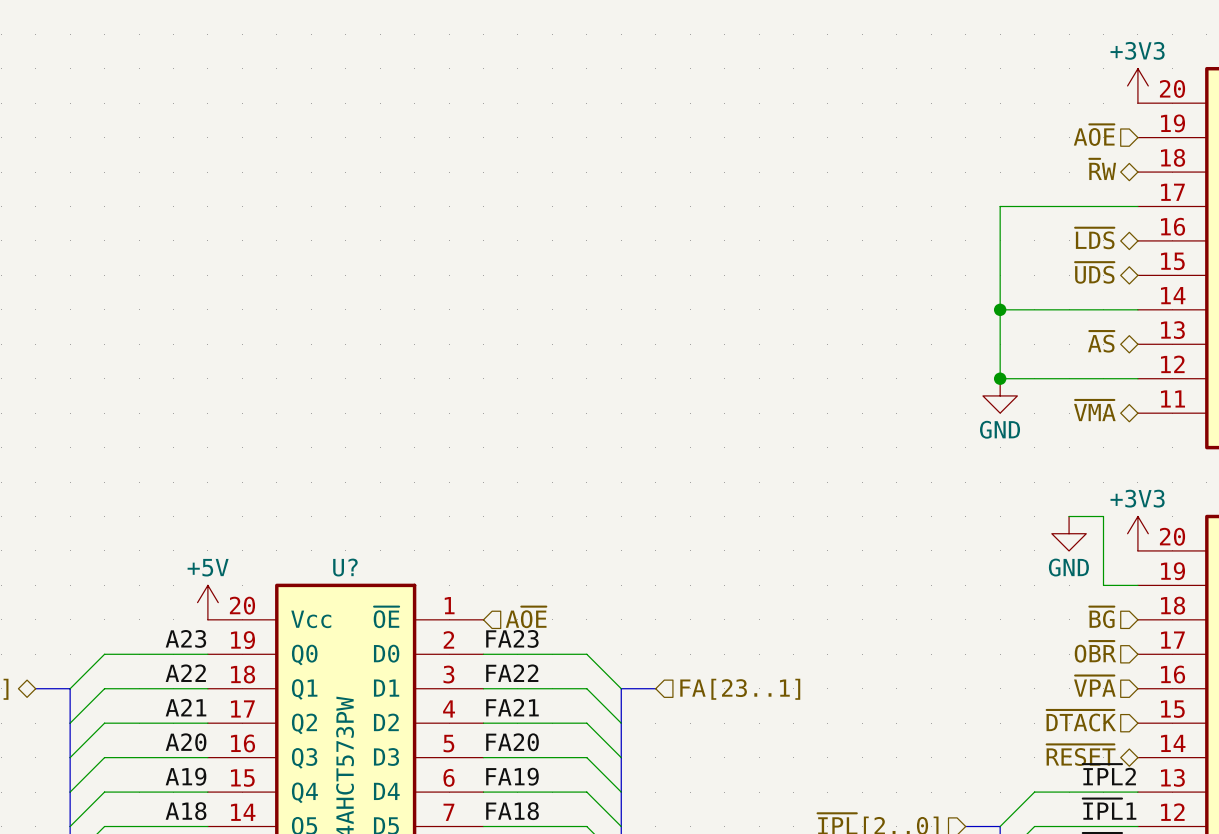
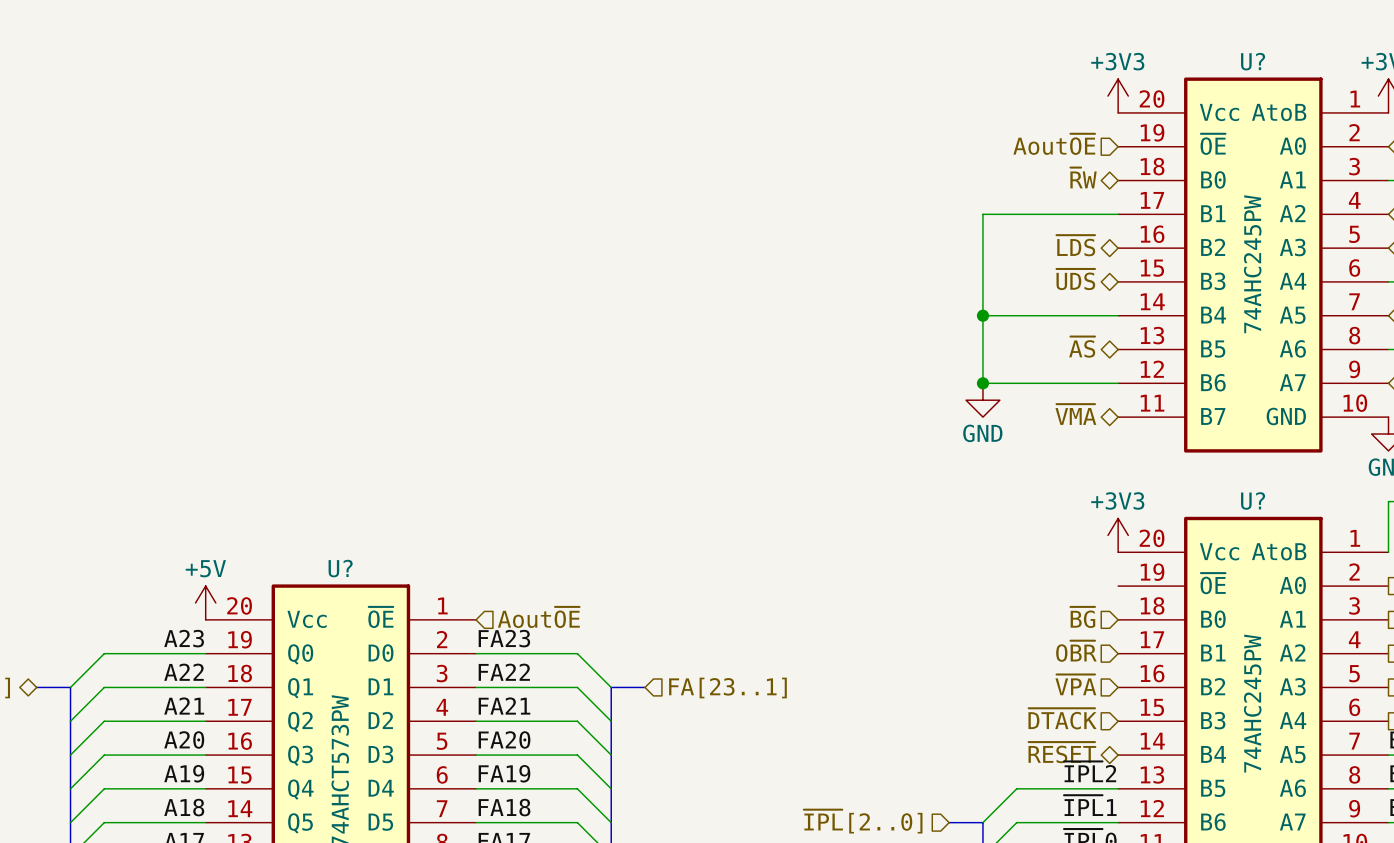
hierarchical label: A~{OE} (1094, 135) -> Aout~{OE} (1054, 144)
wire: (1069, 516) (1103, 516) (1103, 585) (1137, 585) -> none
power symbol: GND (1069, 533) -> none
hierarchical label: A~{OE} (526, 617) -> Aout~{OE} (538, 617)

